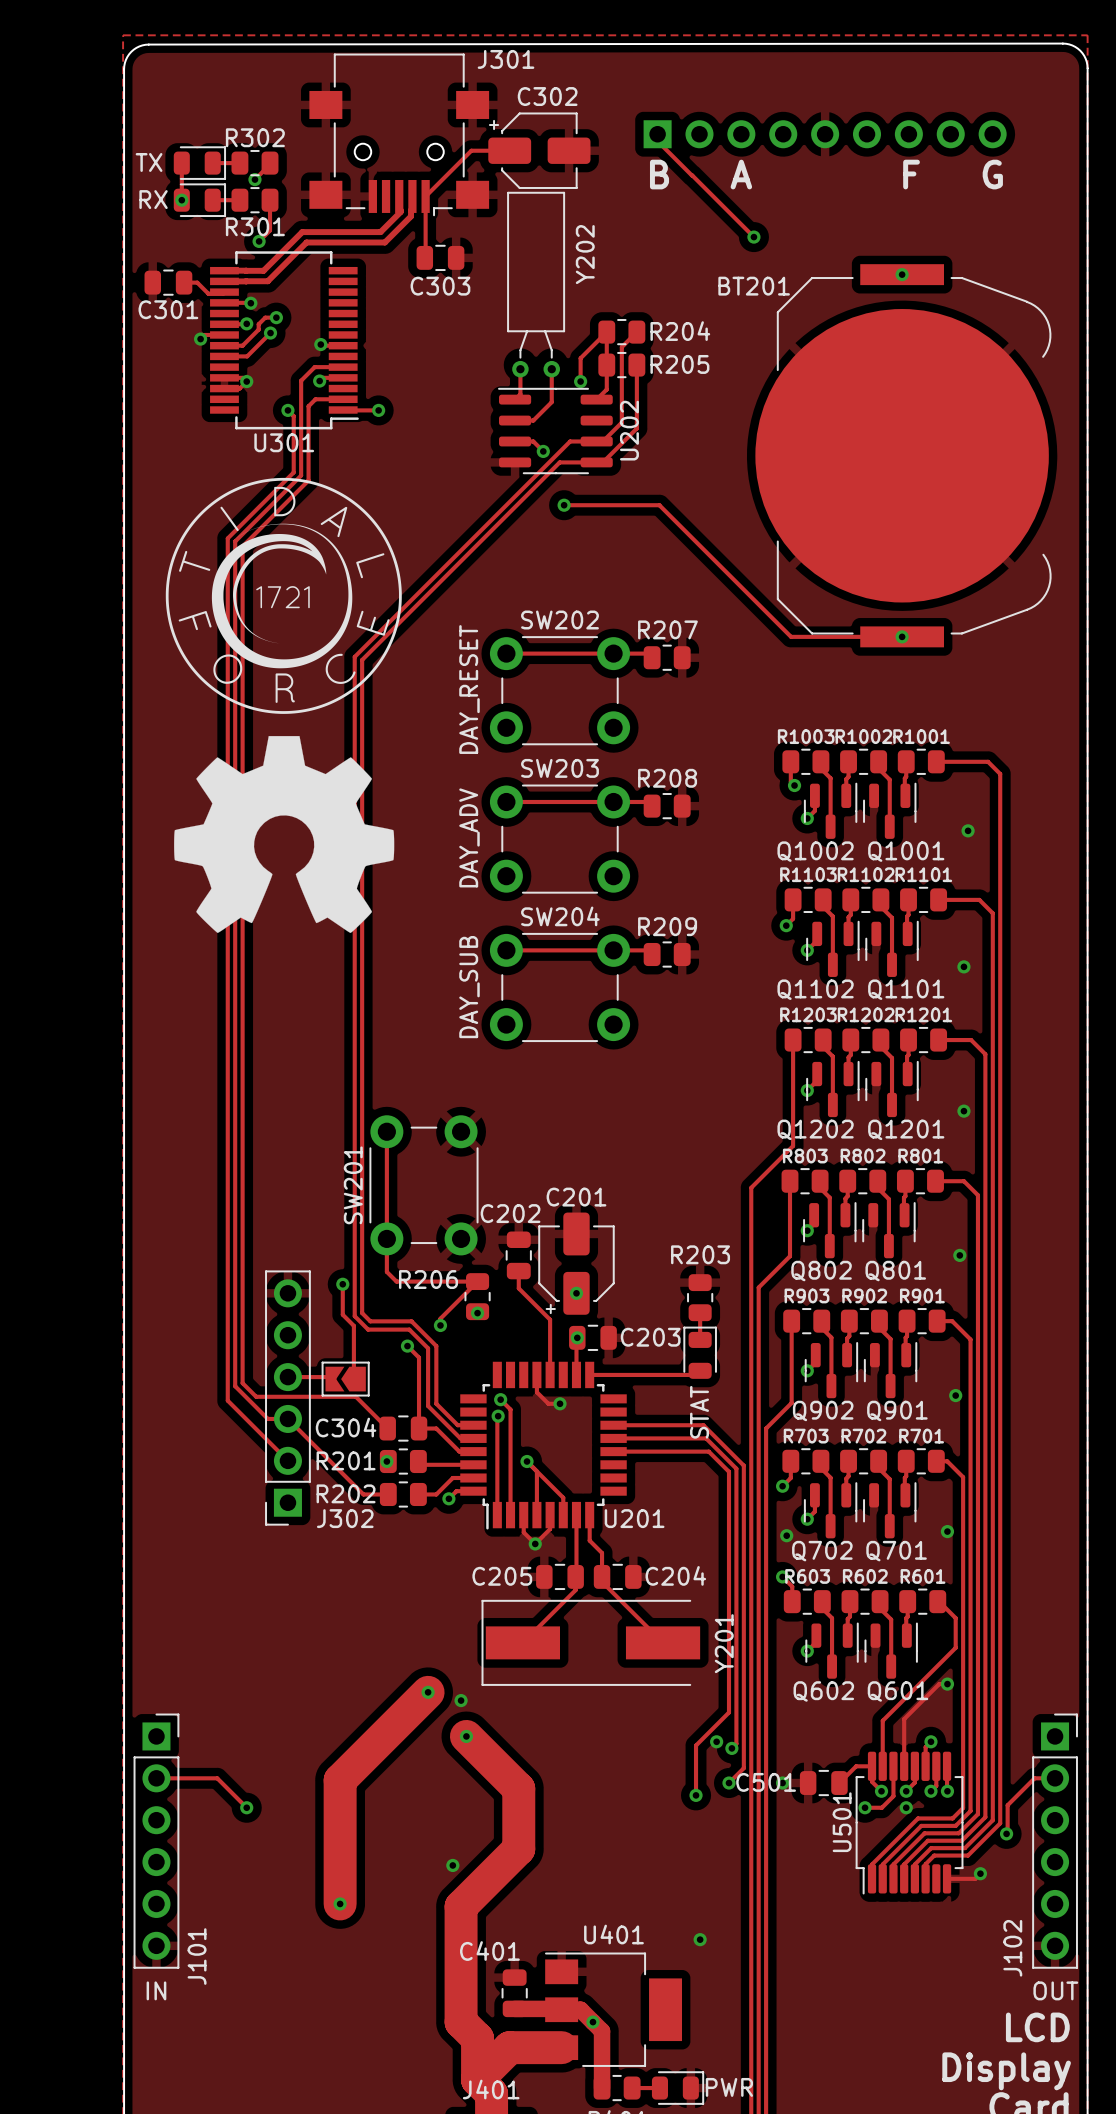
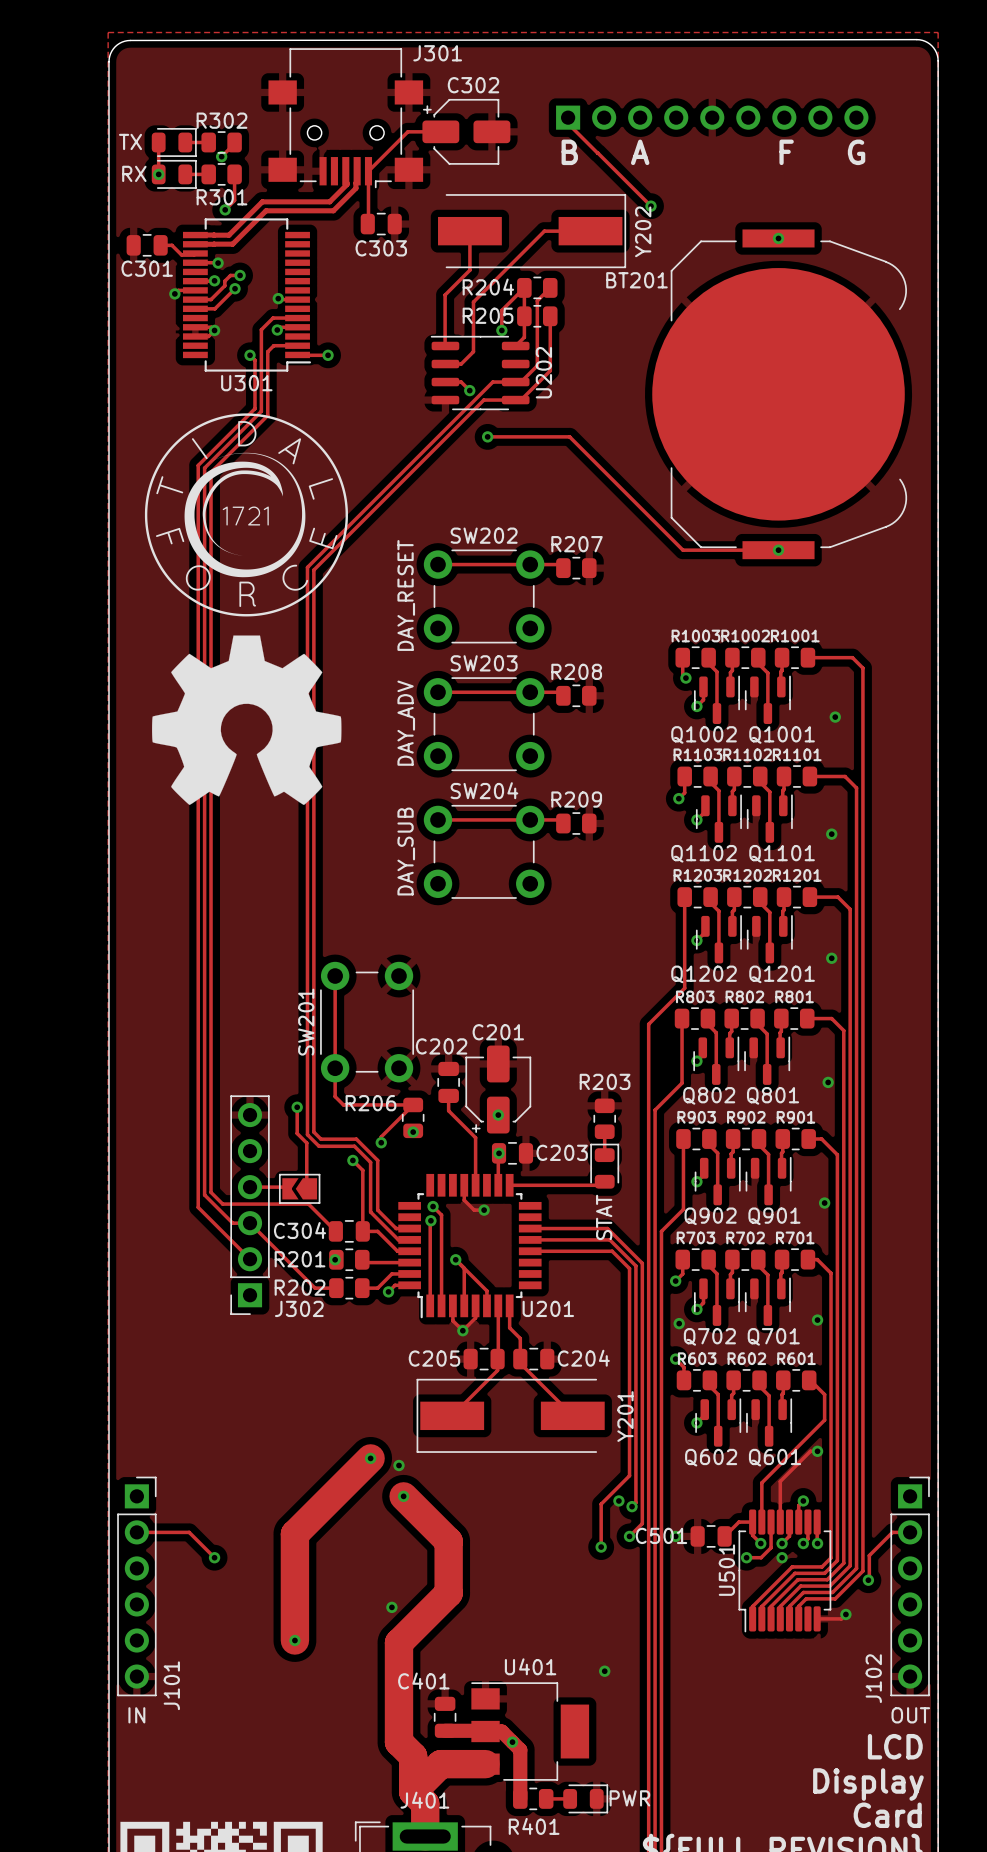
Y202 footprint: [507, 191, 566, 378] -> [438, 194, 627, 269]
Y202 name position: Y202 (585, 254) -> Y202 (643, 231)
BT201 name position: BT201 (754, 286) -> BT201 (636, 280)
R204 name position: R204 (680, 331) -> R204 (488, 287)
R205 name position: R205 (679, 364) -> R205 (488, 315)
track: (520, 369) (520, 394) (515, 399) -> (469, 231) (469, 270) (445, 295) (445, 345)
track: (551, 369) (551, 402) (547, 406) -> (590, 231) (544, 231) (473, 302) (473, 351)

